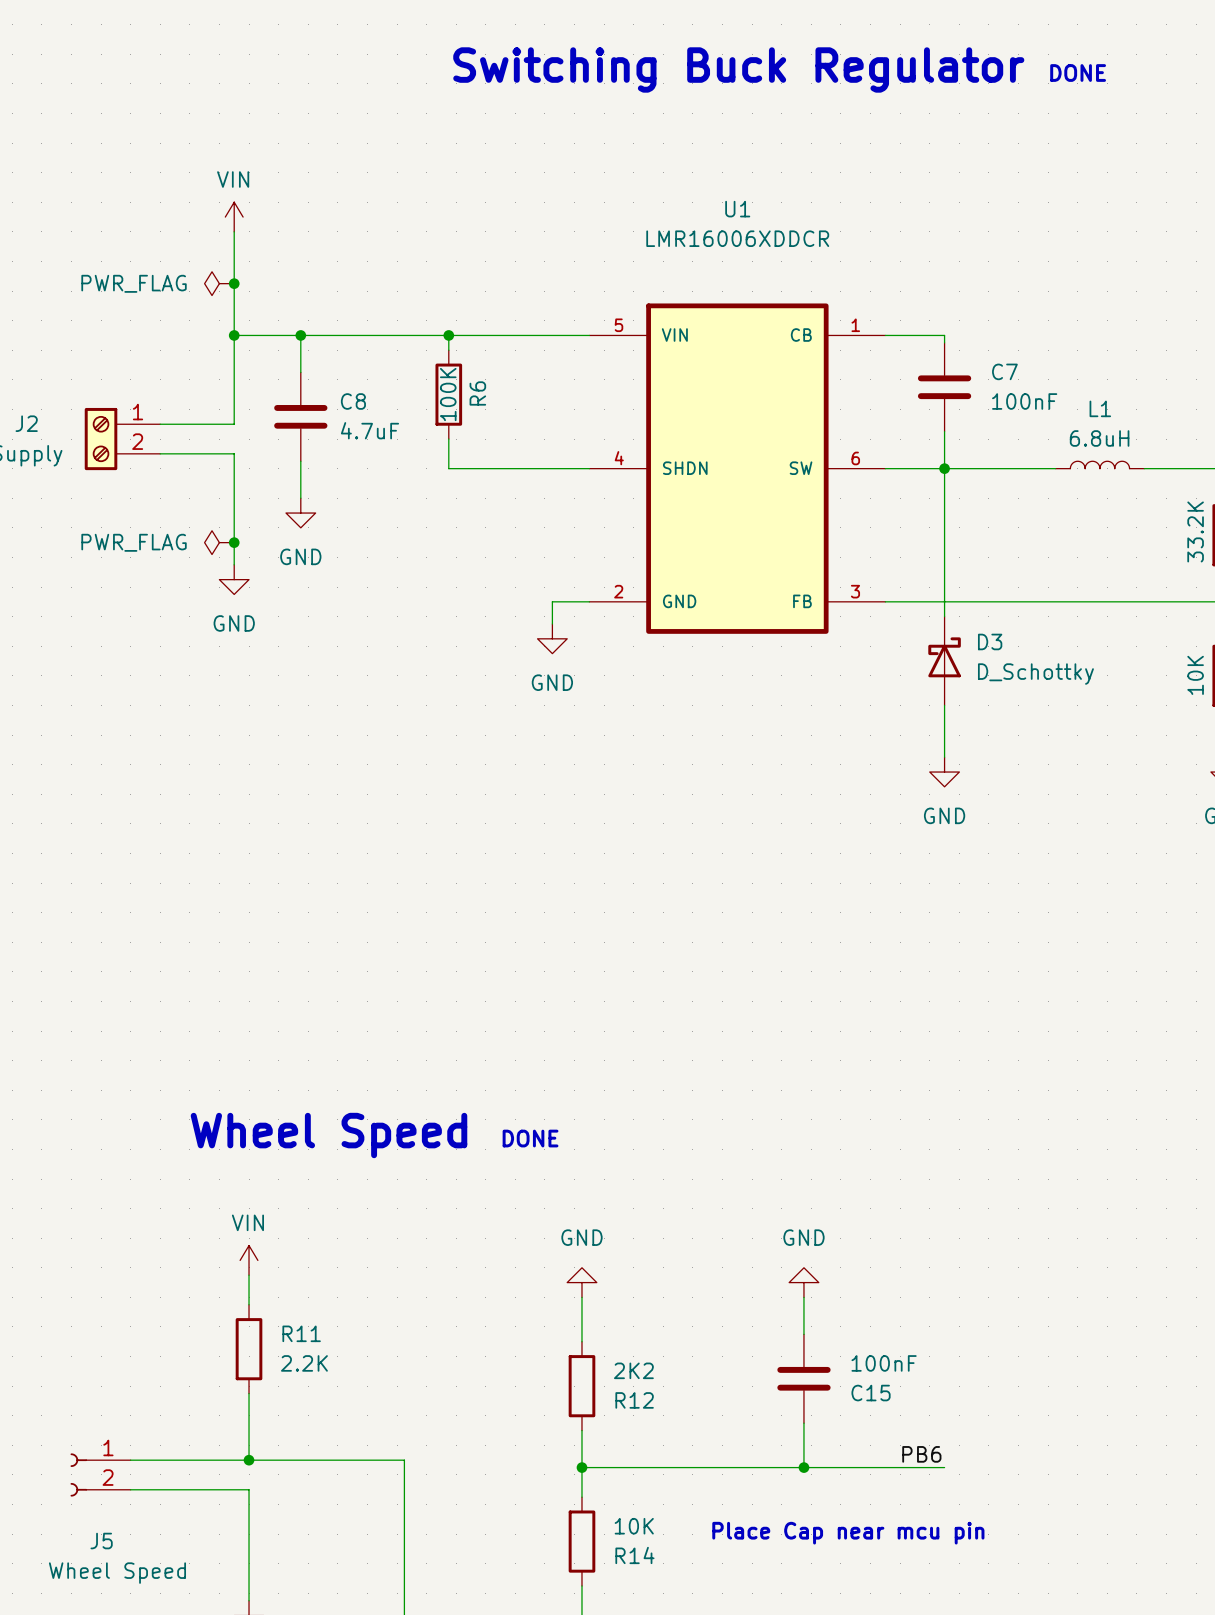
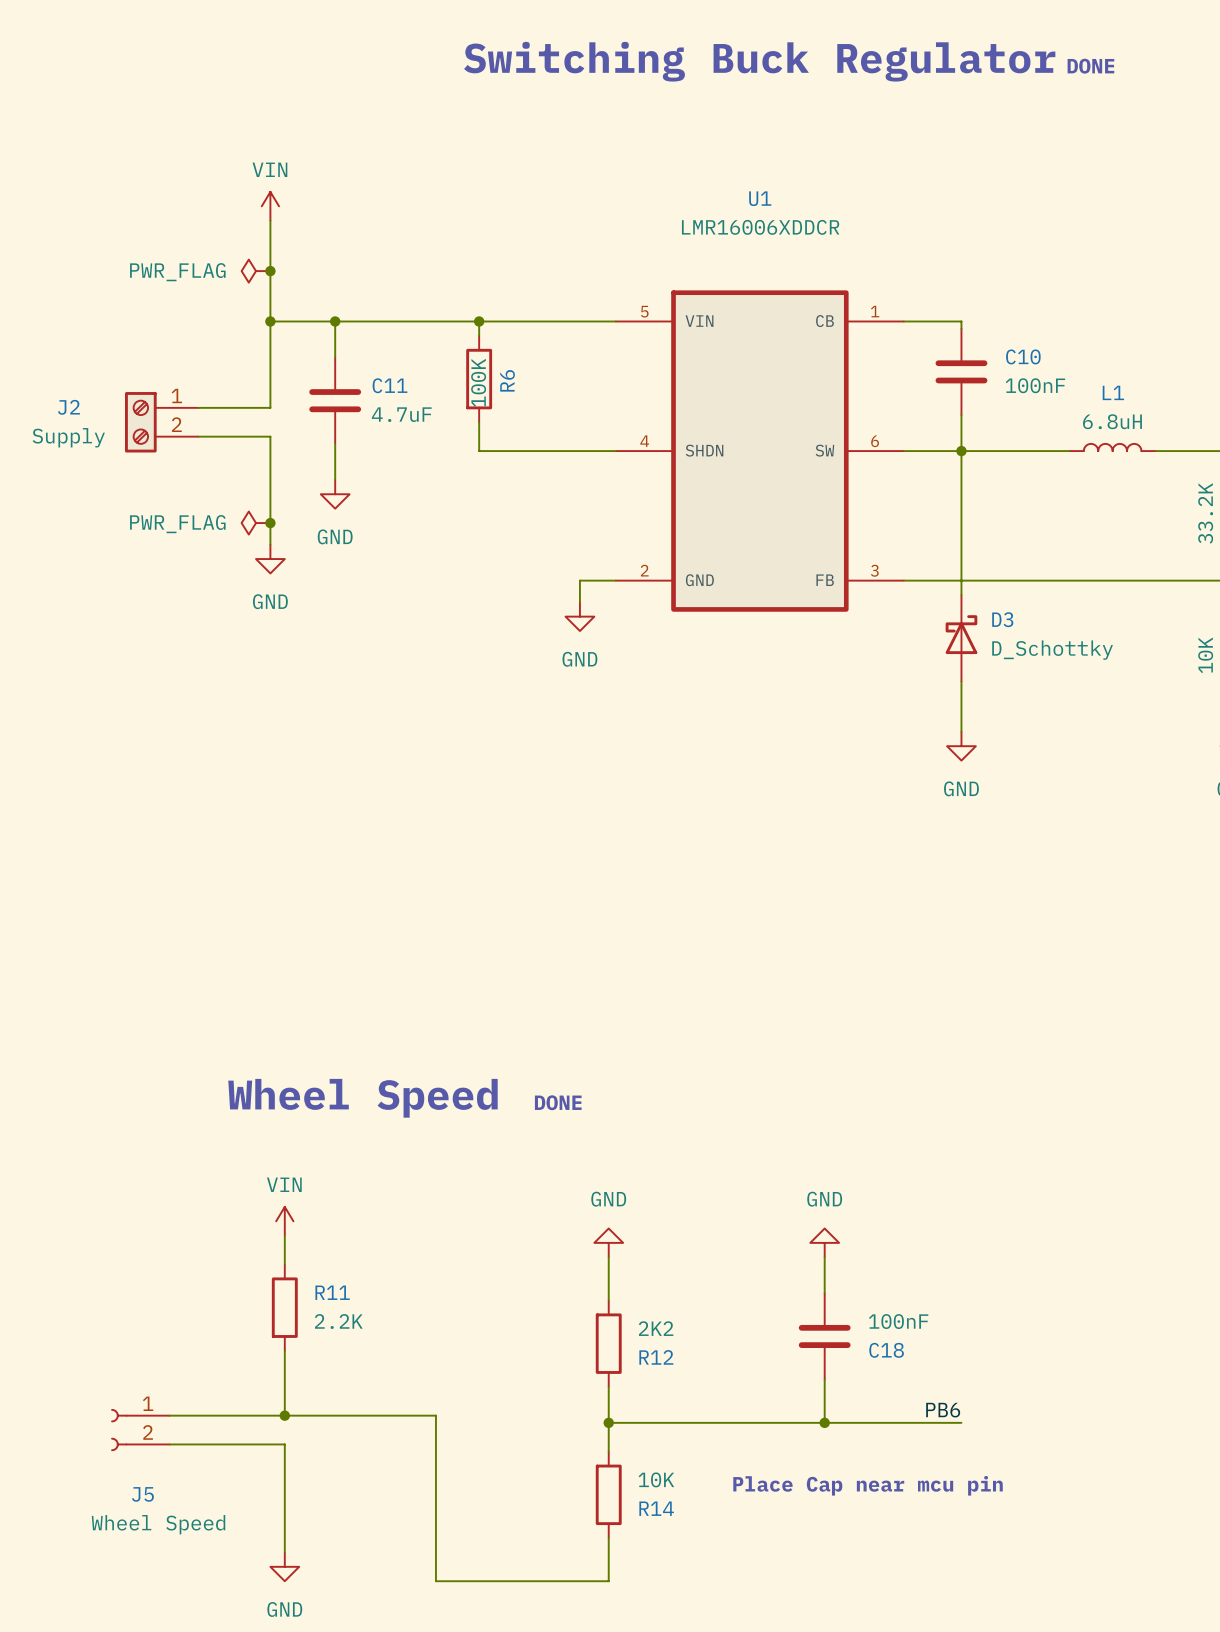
C7 name: C7 (1004, 371) -> C10 (1023, 356)
C8 name: C8 (353, 401) -> C11 (389, 385)
C15 name: C15 (871, 1393) -> C18 (886, 1350)

